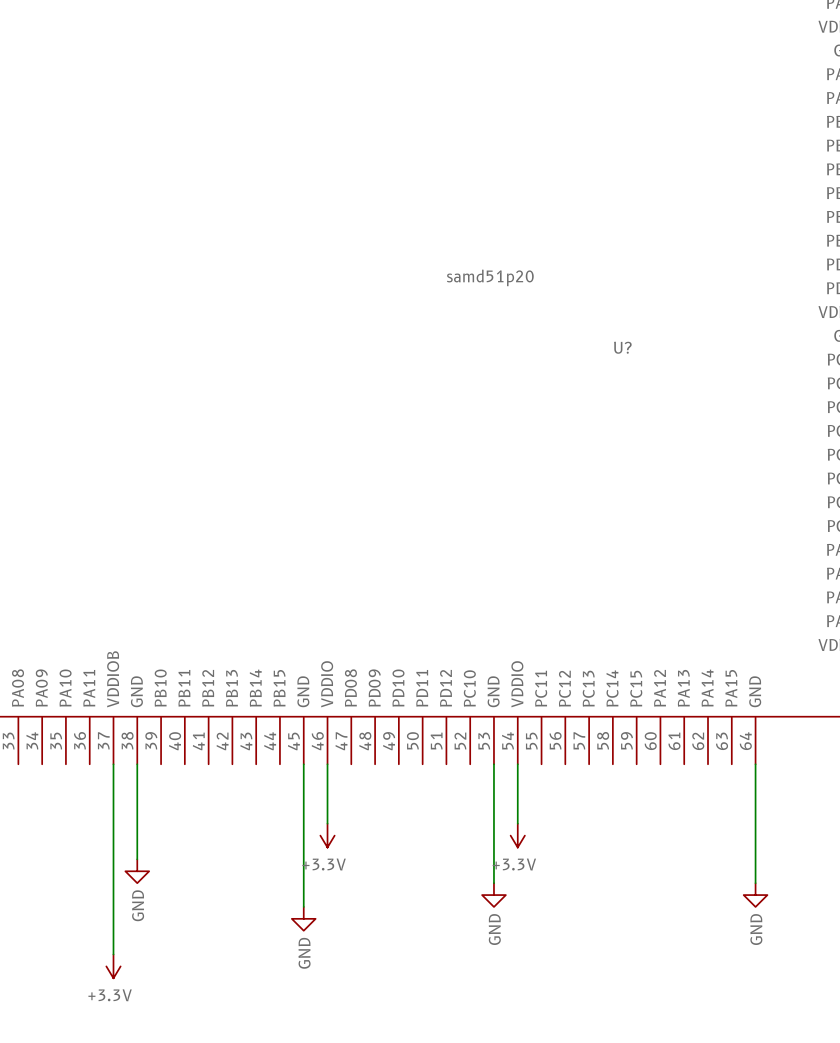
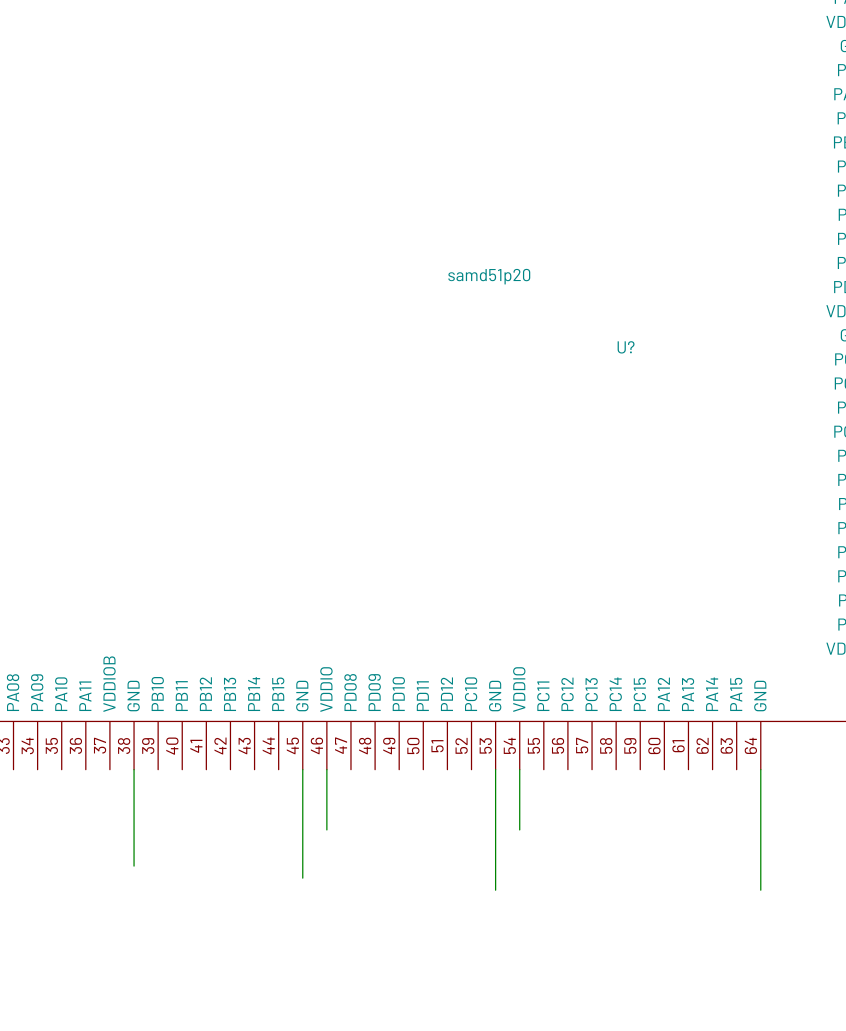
wire: (113, 764) (113, 954) -> none
power symbol: +3.3V (327, 835) -> none
power symbol: +3.3V (517, 835) -> none
power symbol: GND (137, 871) -> none
wire: (303, 871) (303, 906) -> none
power symbol: GND (493, 895) -> none
power symbol: GND (755, 895) -> none
power symbol: GND (303, 918) -> none
power symbol: +3.3V (113, 966) -> none

